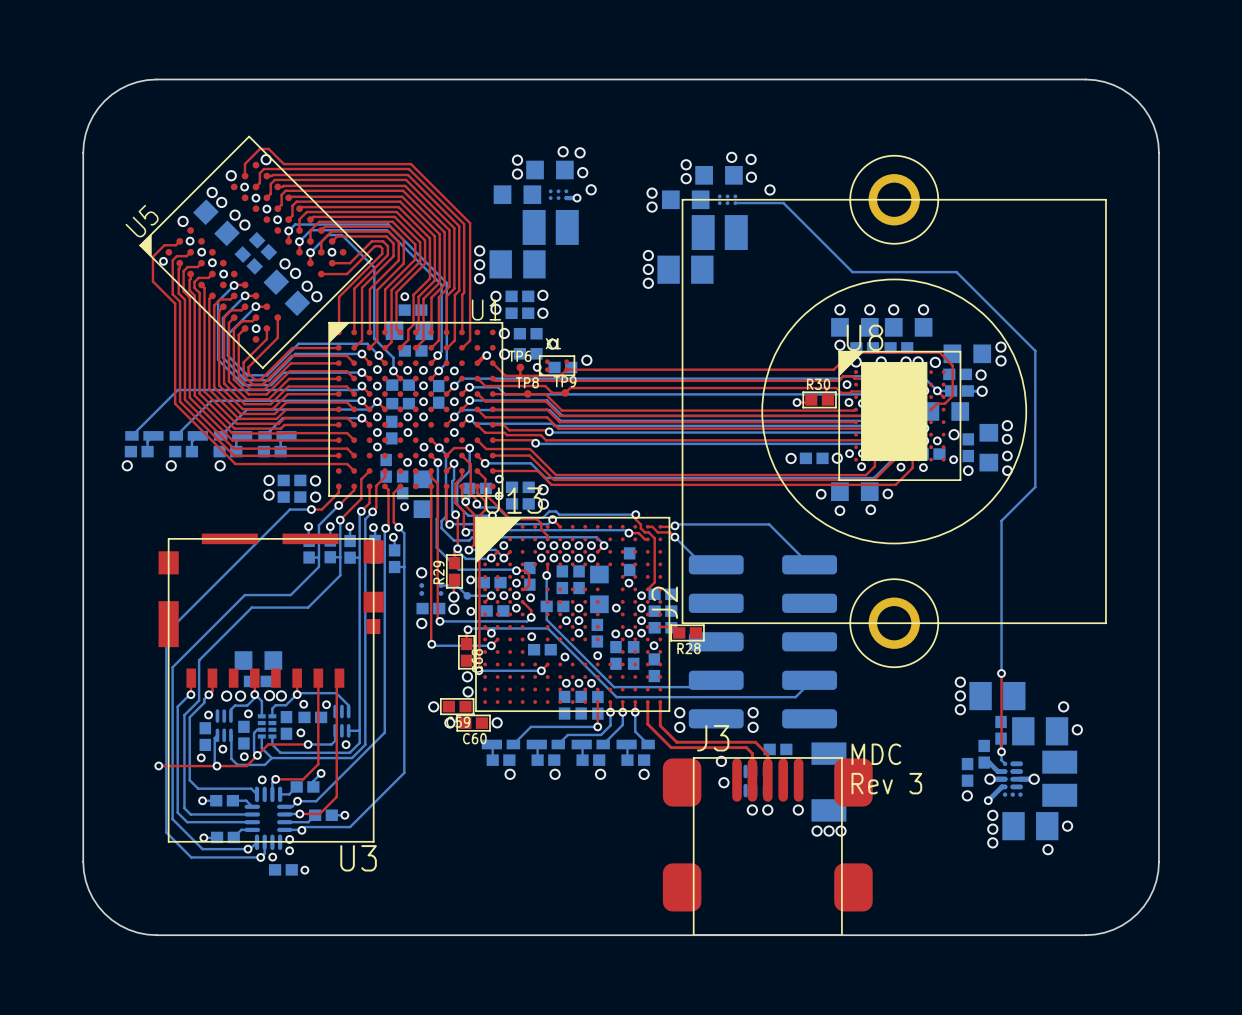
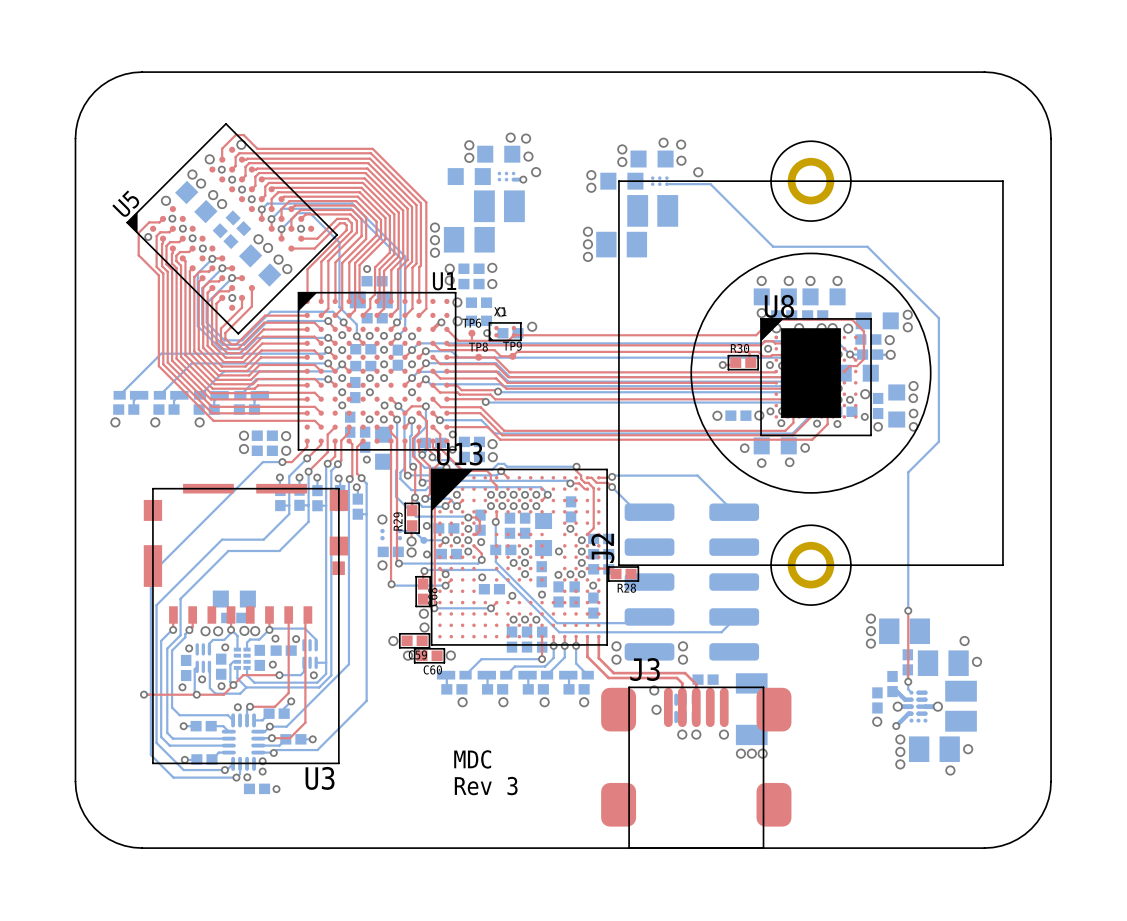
text position: MDC (876, 754) -> MDC (472, 759)
text position: Rev 3 (886, 783) -> Rev 3 (486, 786)

